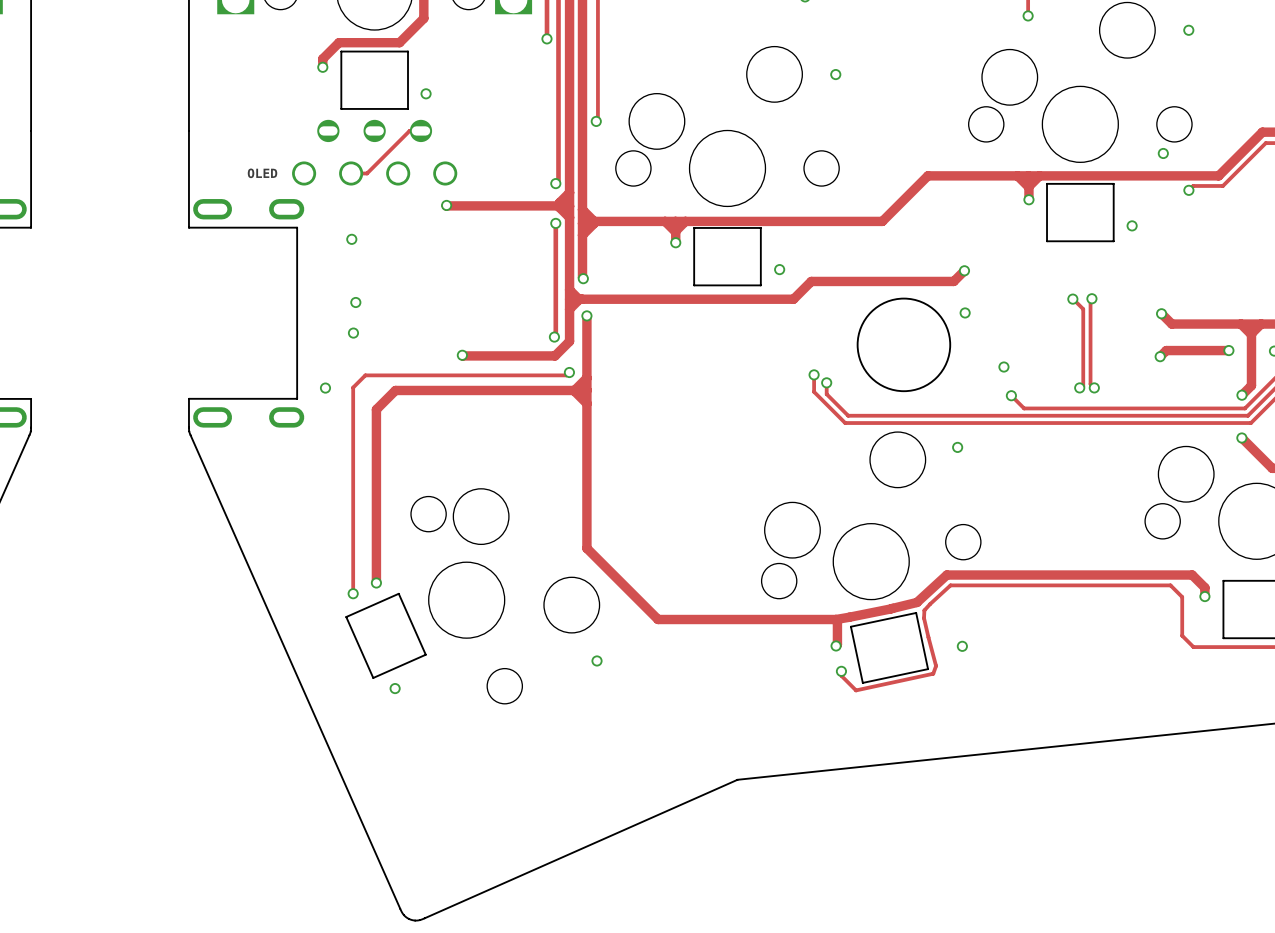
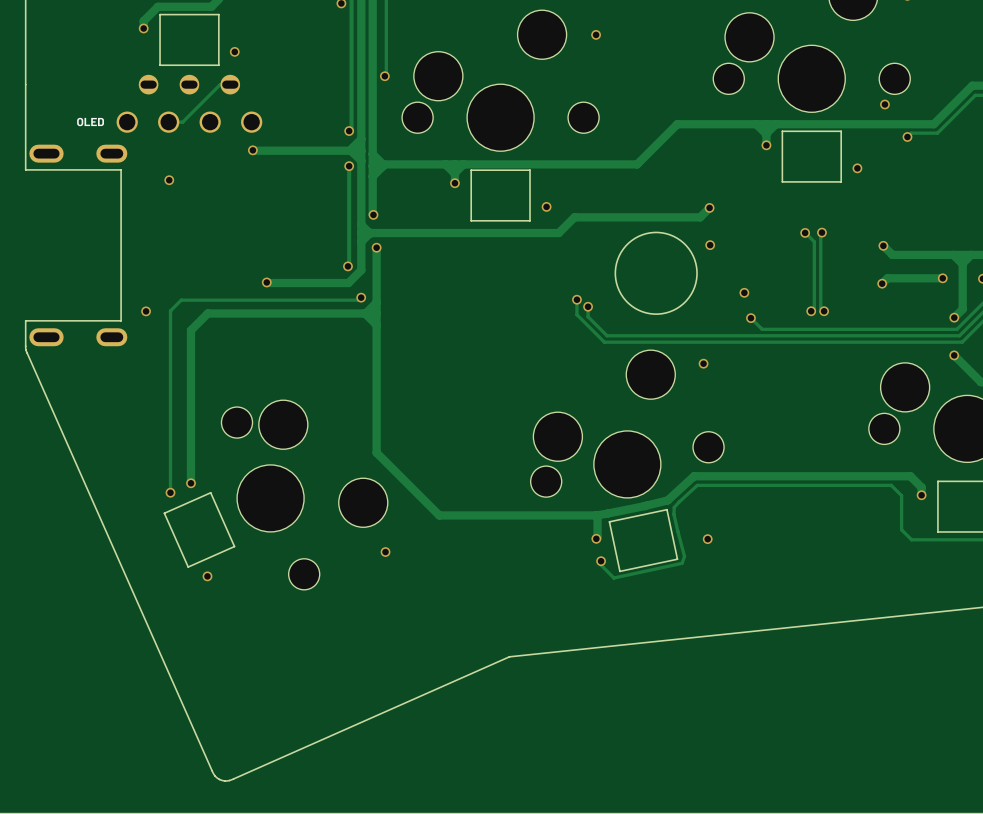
via: (355, 302) -> none
via: (353, 333) -> none

